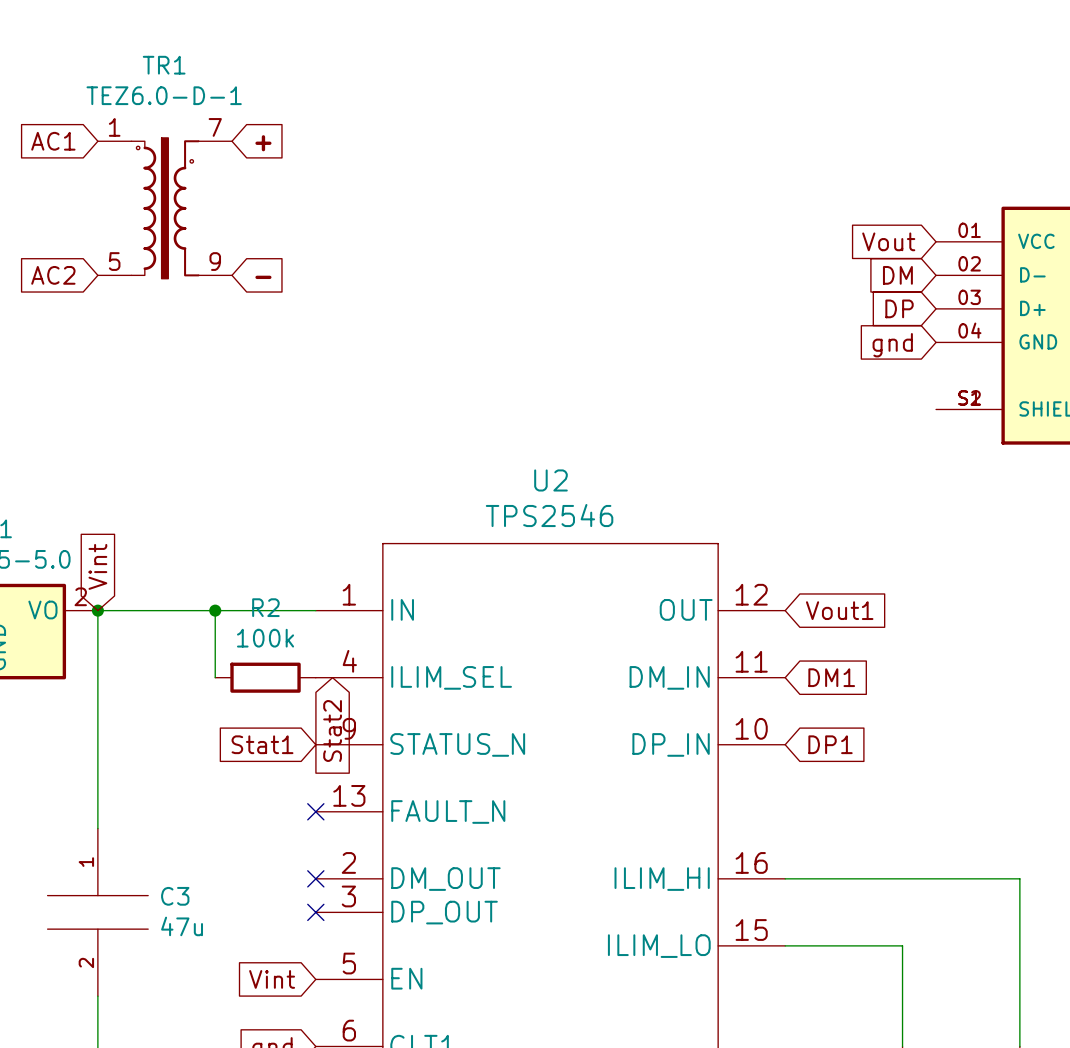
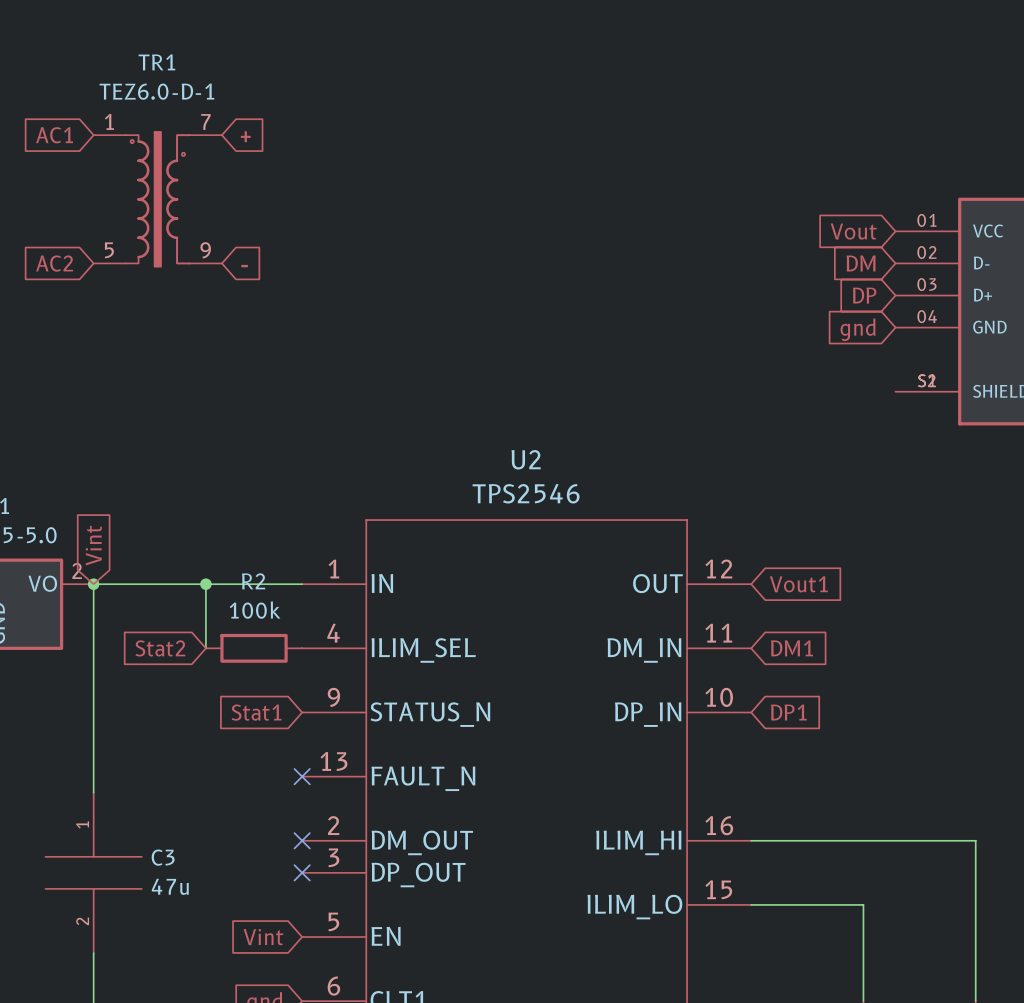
global label rotation: 0° (332, 730) -> 90° clockwise (160, 648)
global label position: Stat2 (332, 730) -> Stat2 (160, 648)

